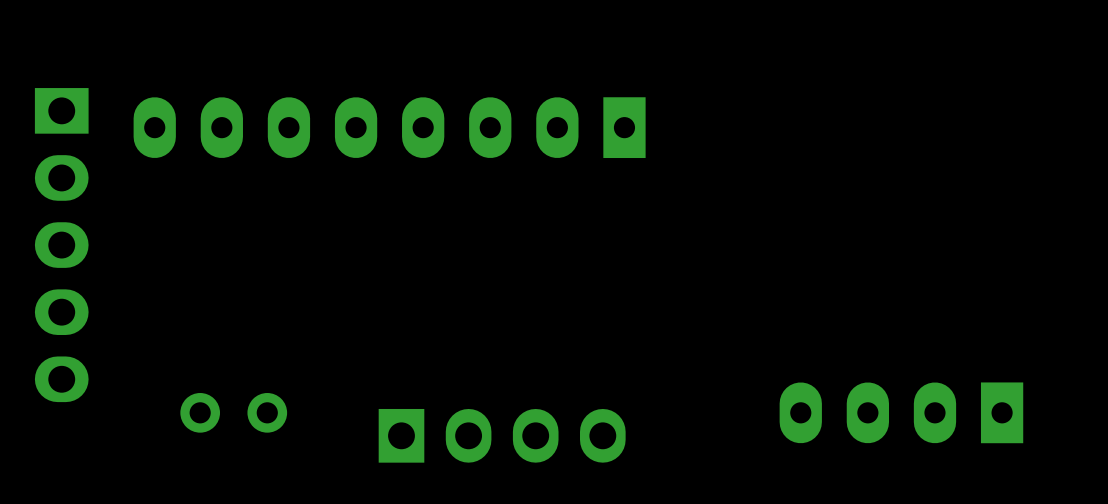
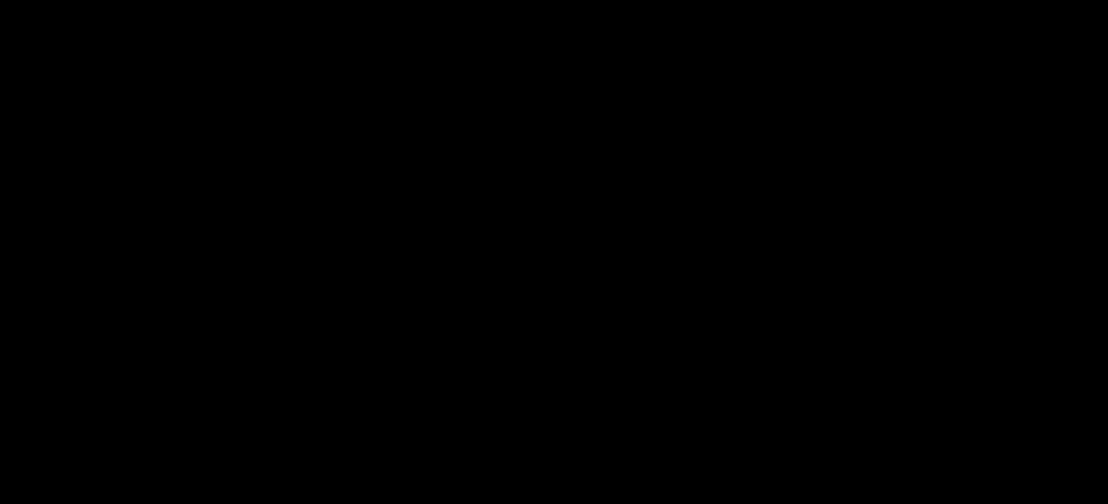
part: (389, 127) -> none
part: (61, 245) -> none
part: (233, 412) -> none
part: (901, 412) -> none
part: (502, 435) -> none

